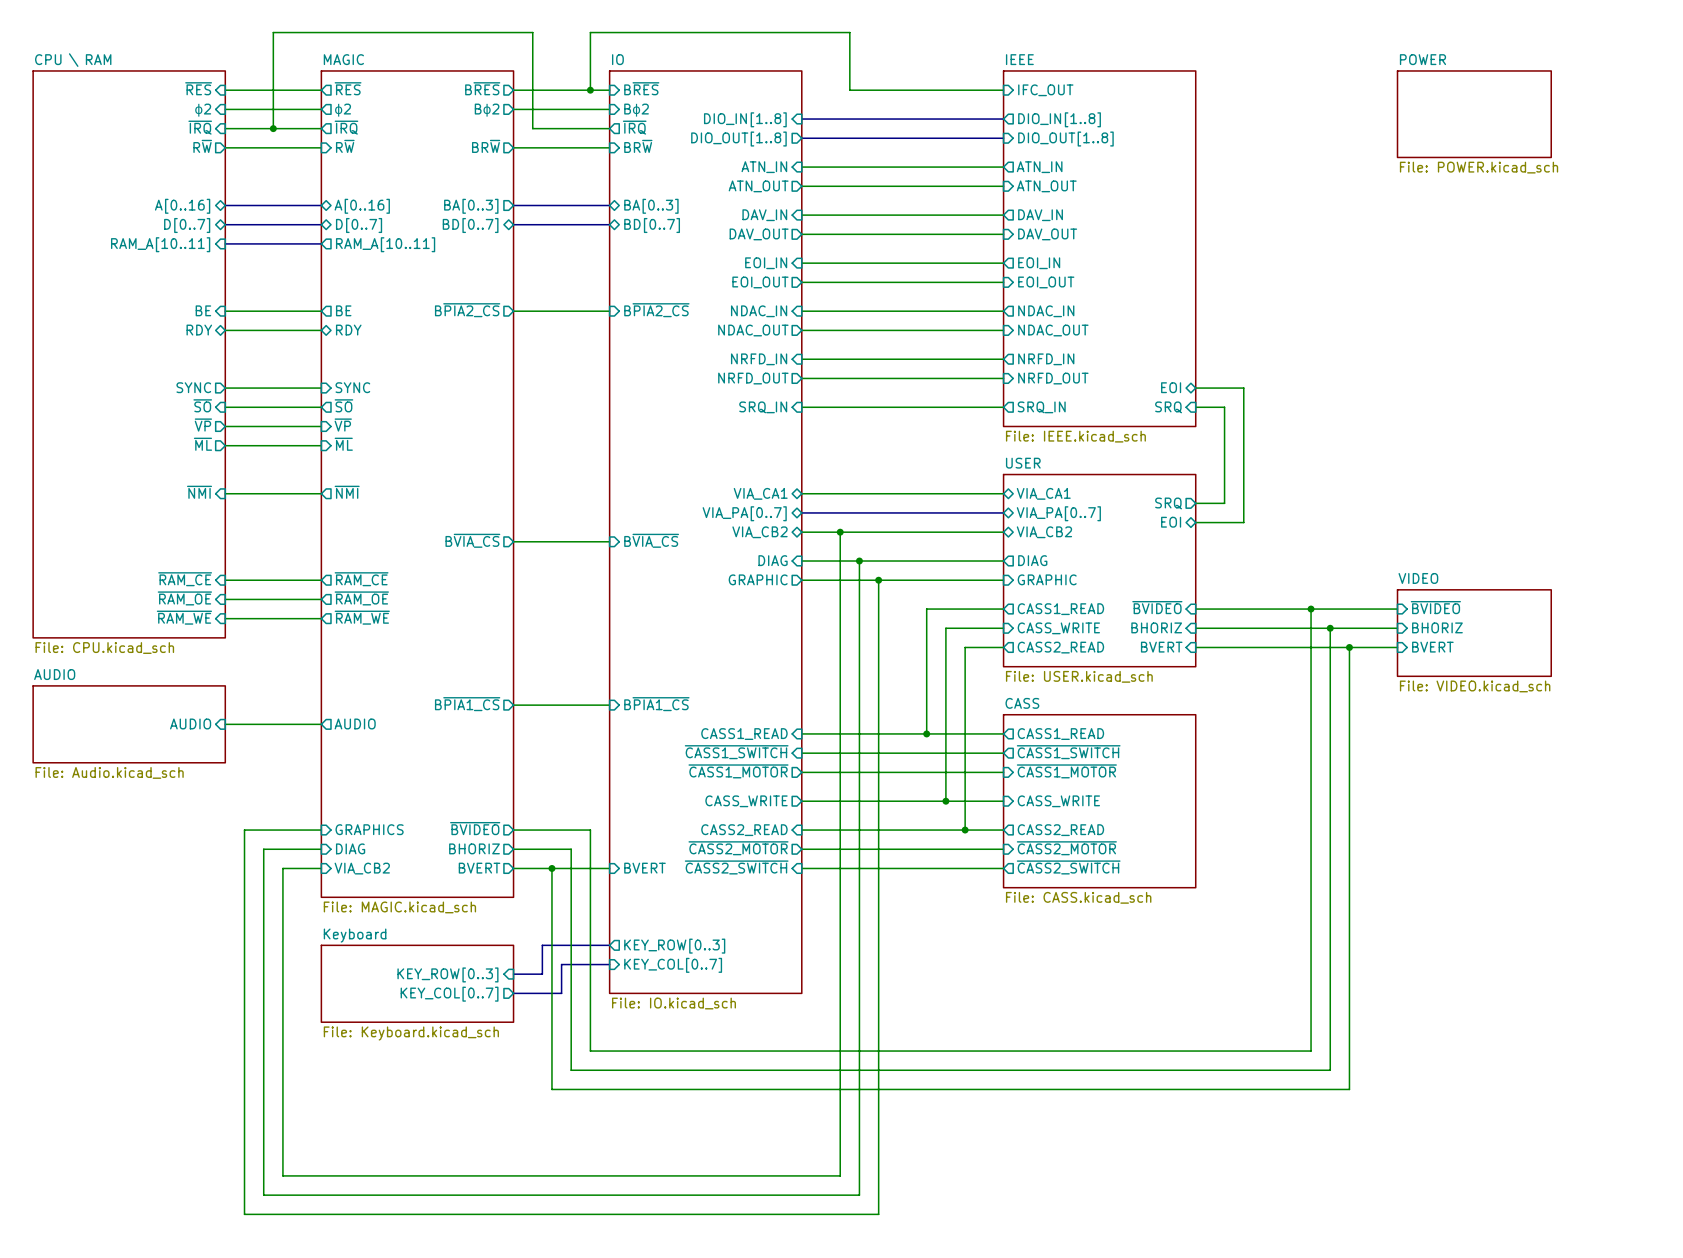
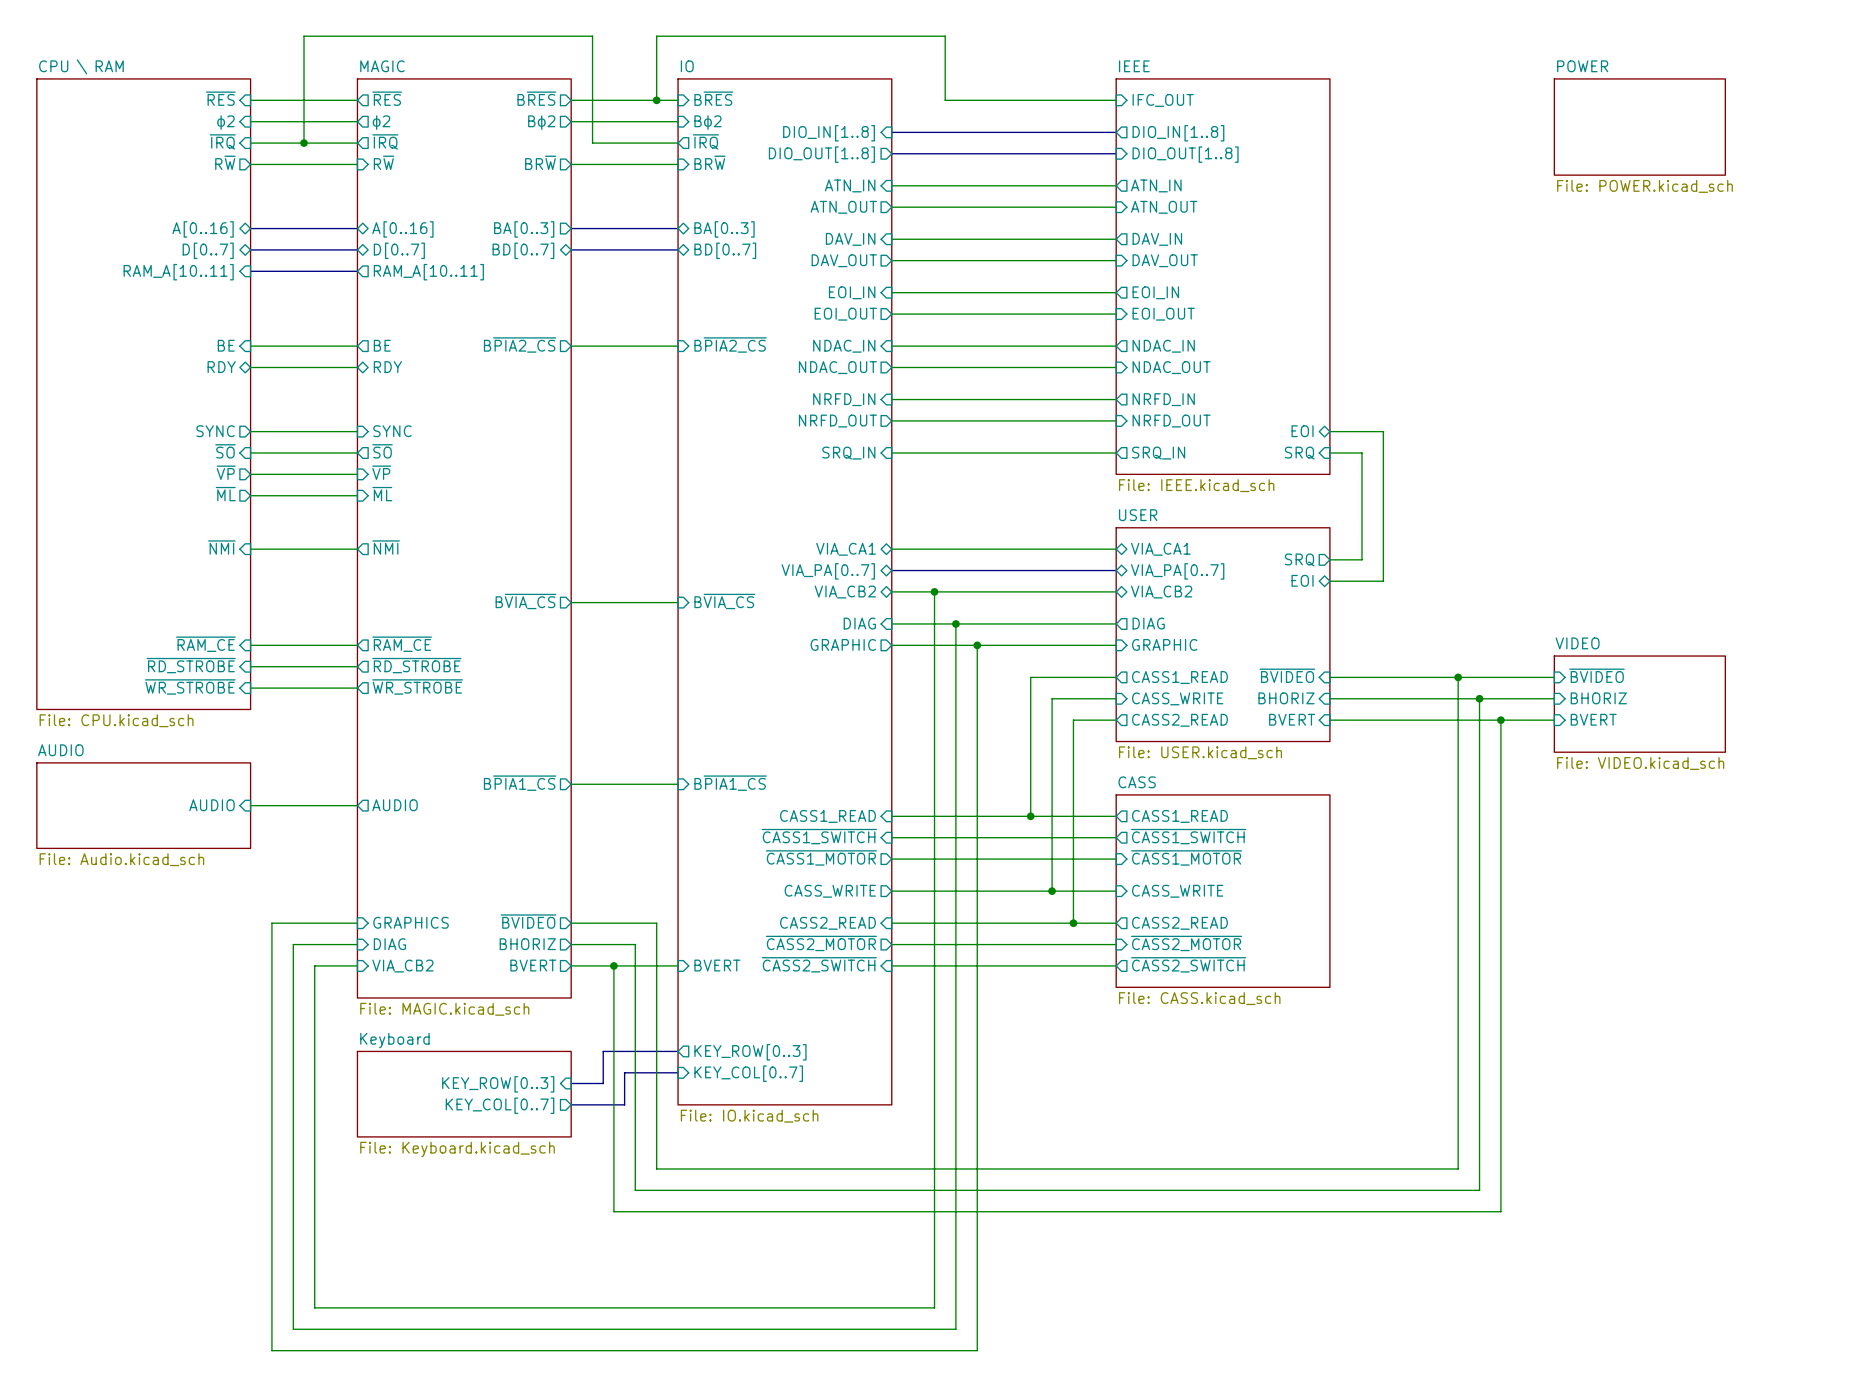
sheet pin: ~{RAM_OE} (184, 598) -> ~{RD_STROBE} (191, 665)
sheet pin: ~{RAM_OE} (361, 598) -> ~{RD_STROBE} (416, 665)
sheet pin: ~{RAM_WE} (184, 617) -> ~{WR_STROBE} (190, 686)
sheet pin: ~{RAM_WE} (362, 617) -> ~{WR_STROBE} (417, 686)

